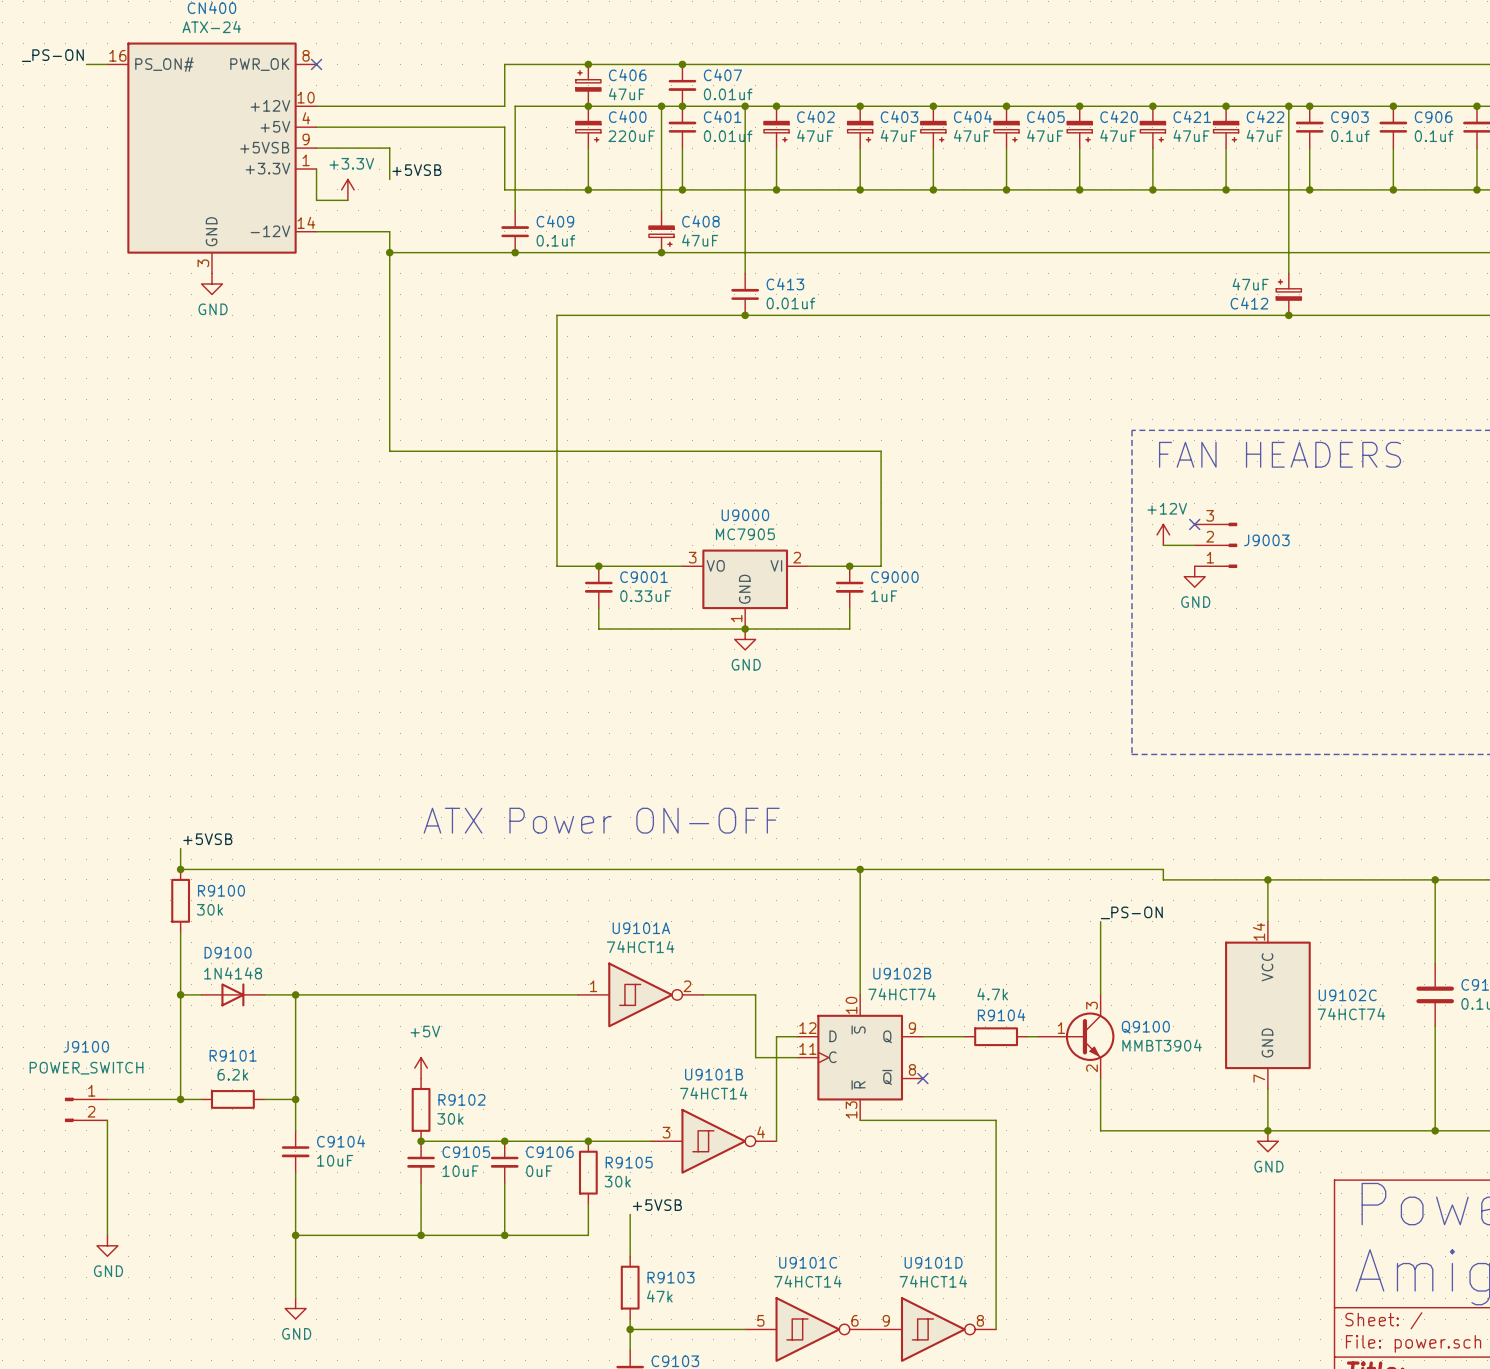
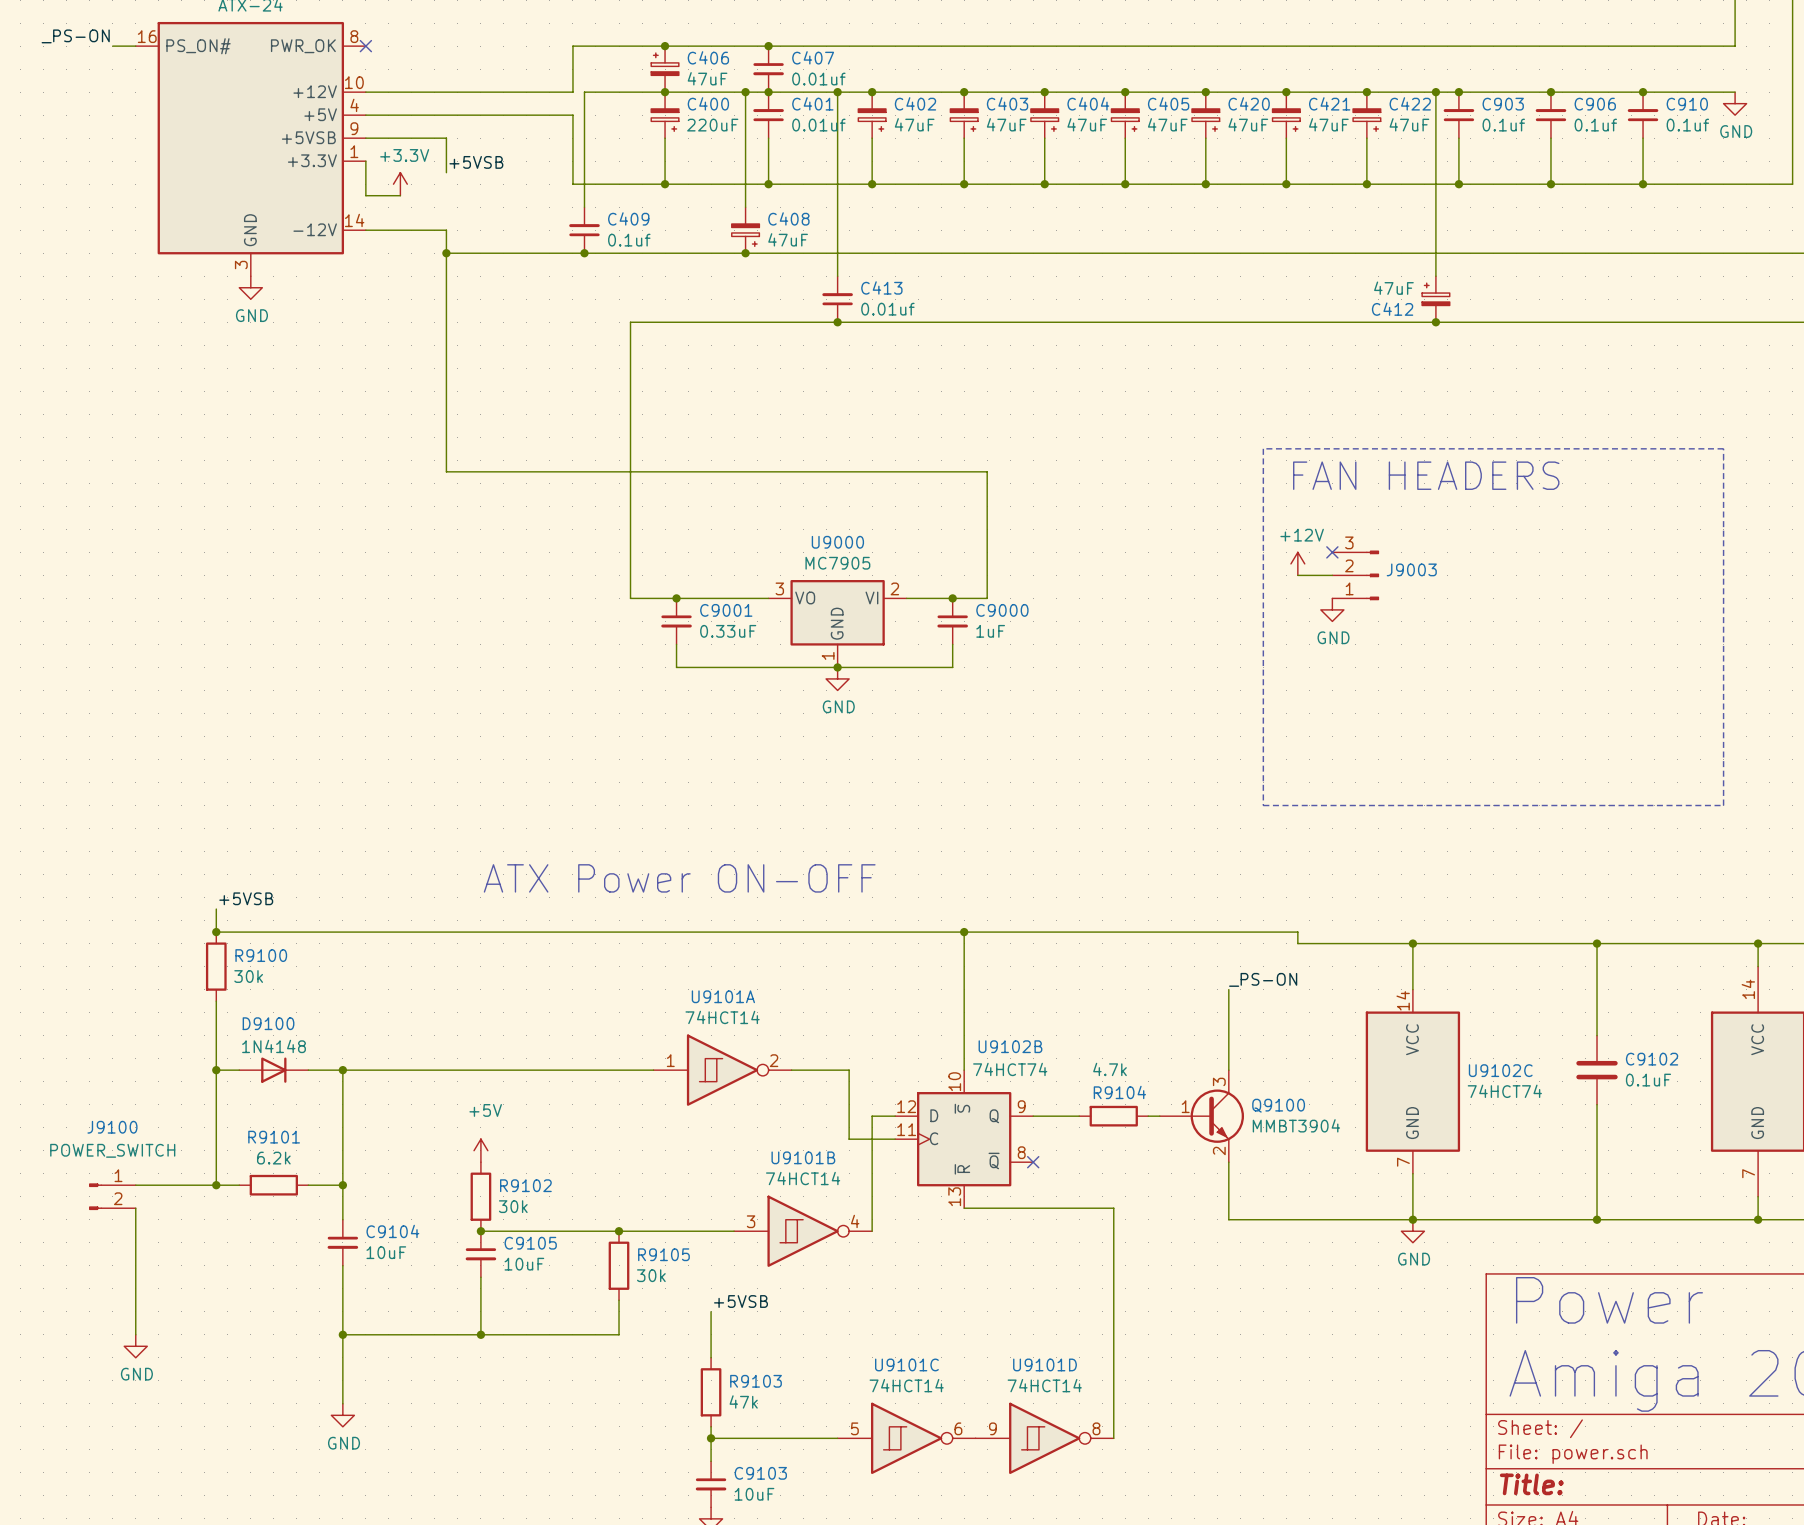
junction: (504, 1141) -> none
junction: none -> (619, 1231)
junction: (588, 1141) -> none
C9106: 0uF (504, 1162) -> none
R9105 position: (588, 1172) -> (619, 1265)
wire: (504, 1183) (504, 1235) -> none
wire: (588, 1204) (588, 1235) (546, 1235) -> (619, 1300) (619, 1334)
junction: (504, 1235) -> none

